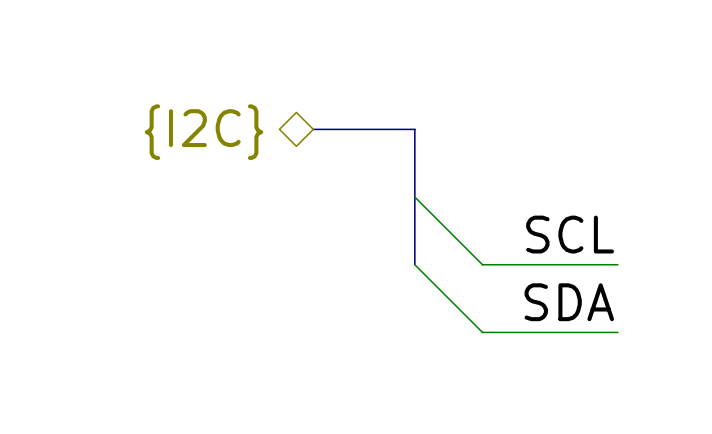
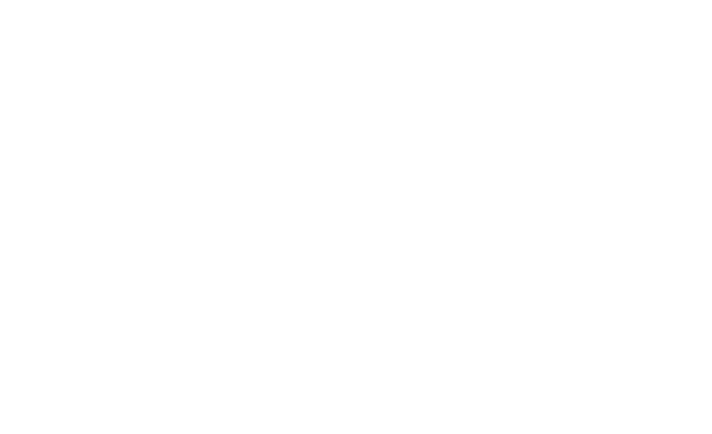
bus: (313, 129) (414, 129) (414, 264) -> none
hierarchical label: {I2C} (204, 132) -> none
wire: (414, 197) (482, 264) (617, 264) -> none
label: SCL (570, 234) -> none
wire: (414, 264) (482, 332) (617, 332) -> none
label: SDA (569, 302) -> none

